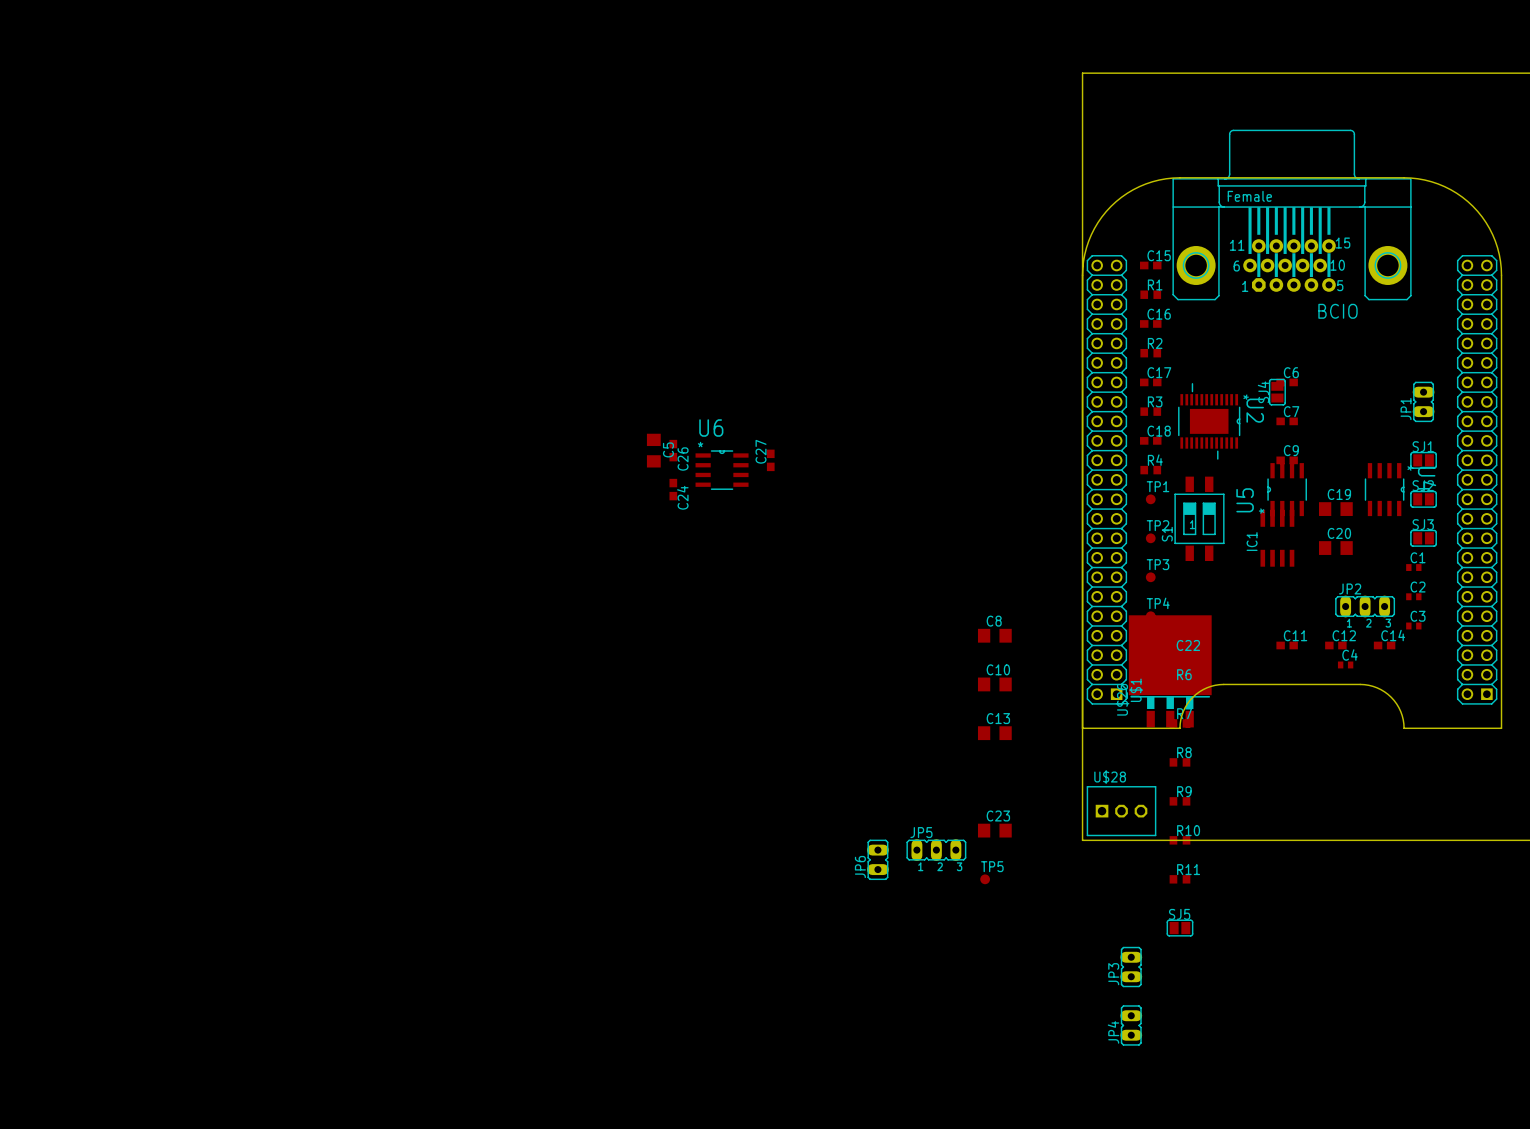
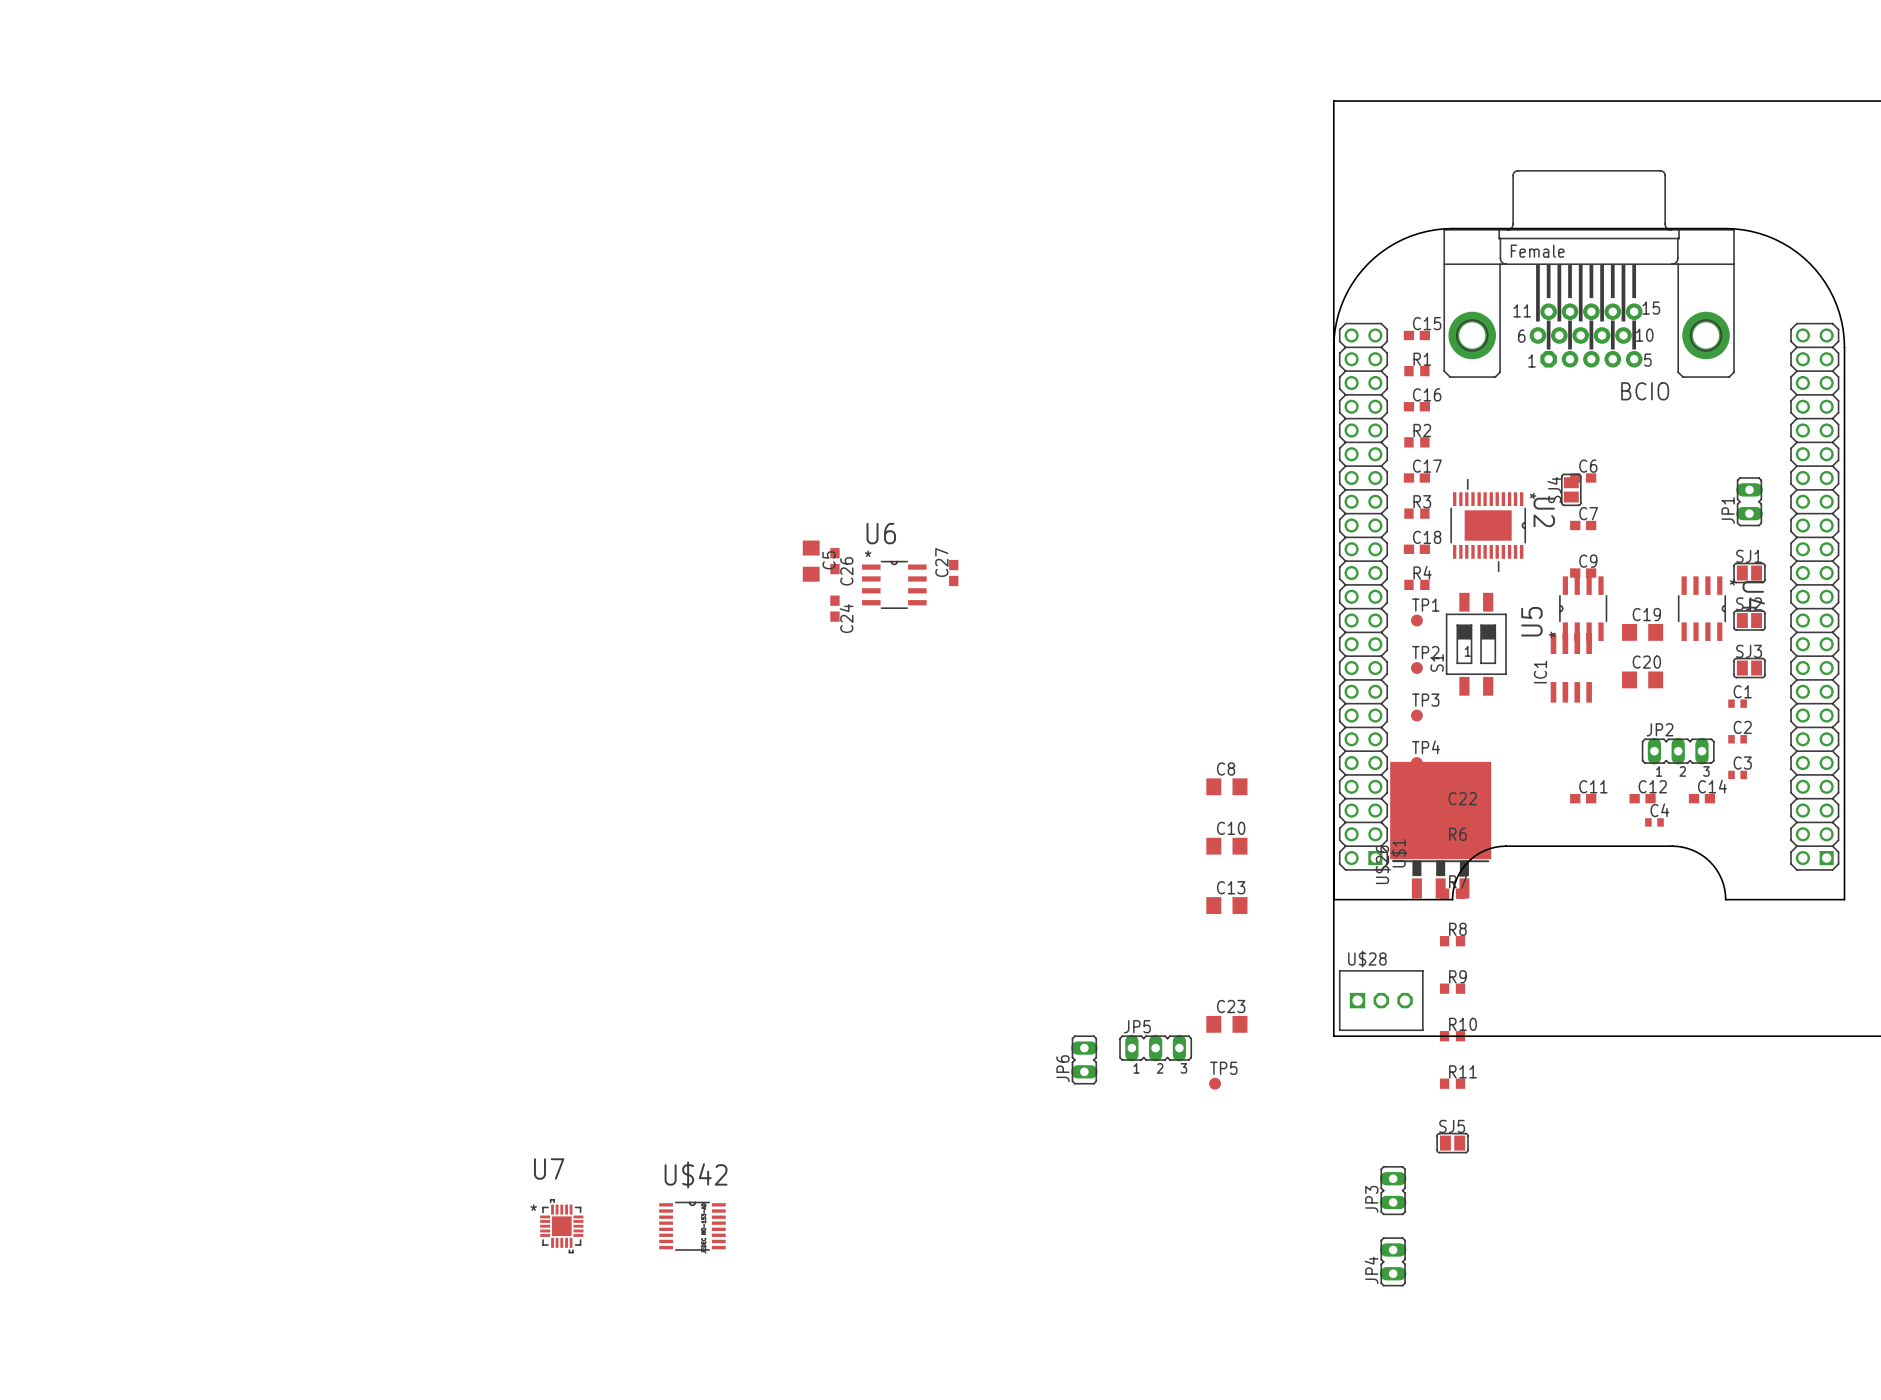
U7: none -> (561, 1226)
U$42: none -> (692, 1226)

